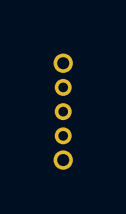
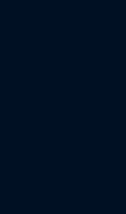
part: (63, 111) -> none

